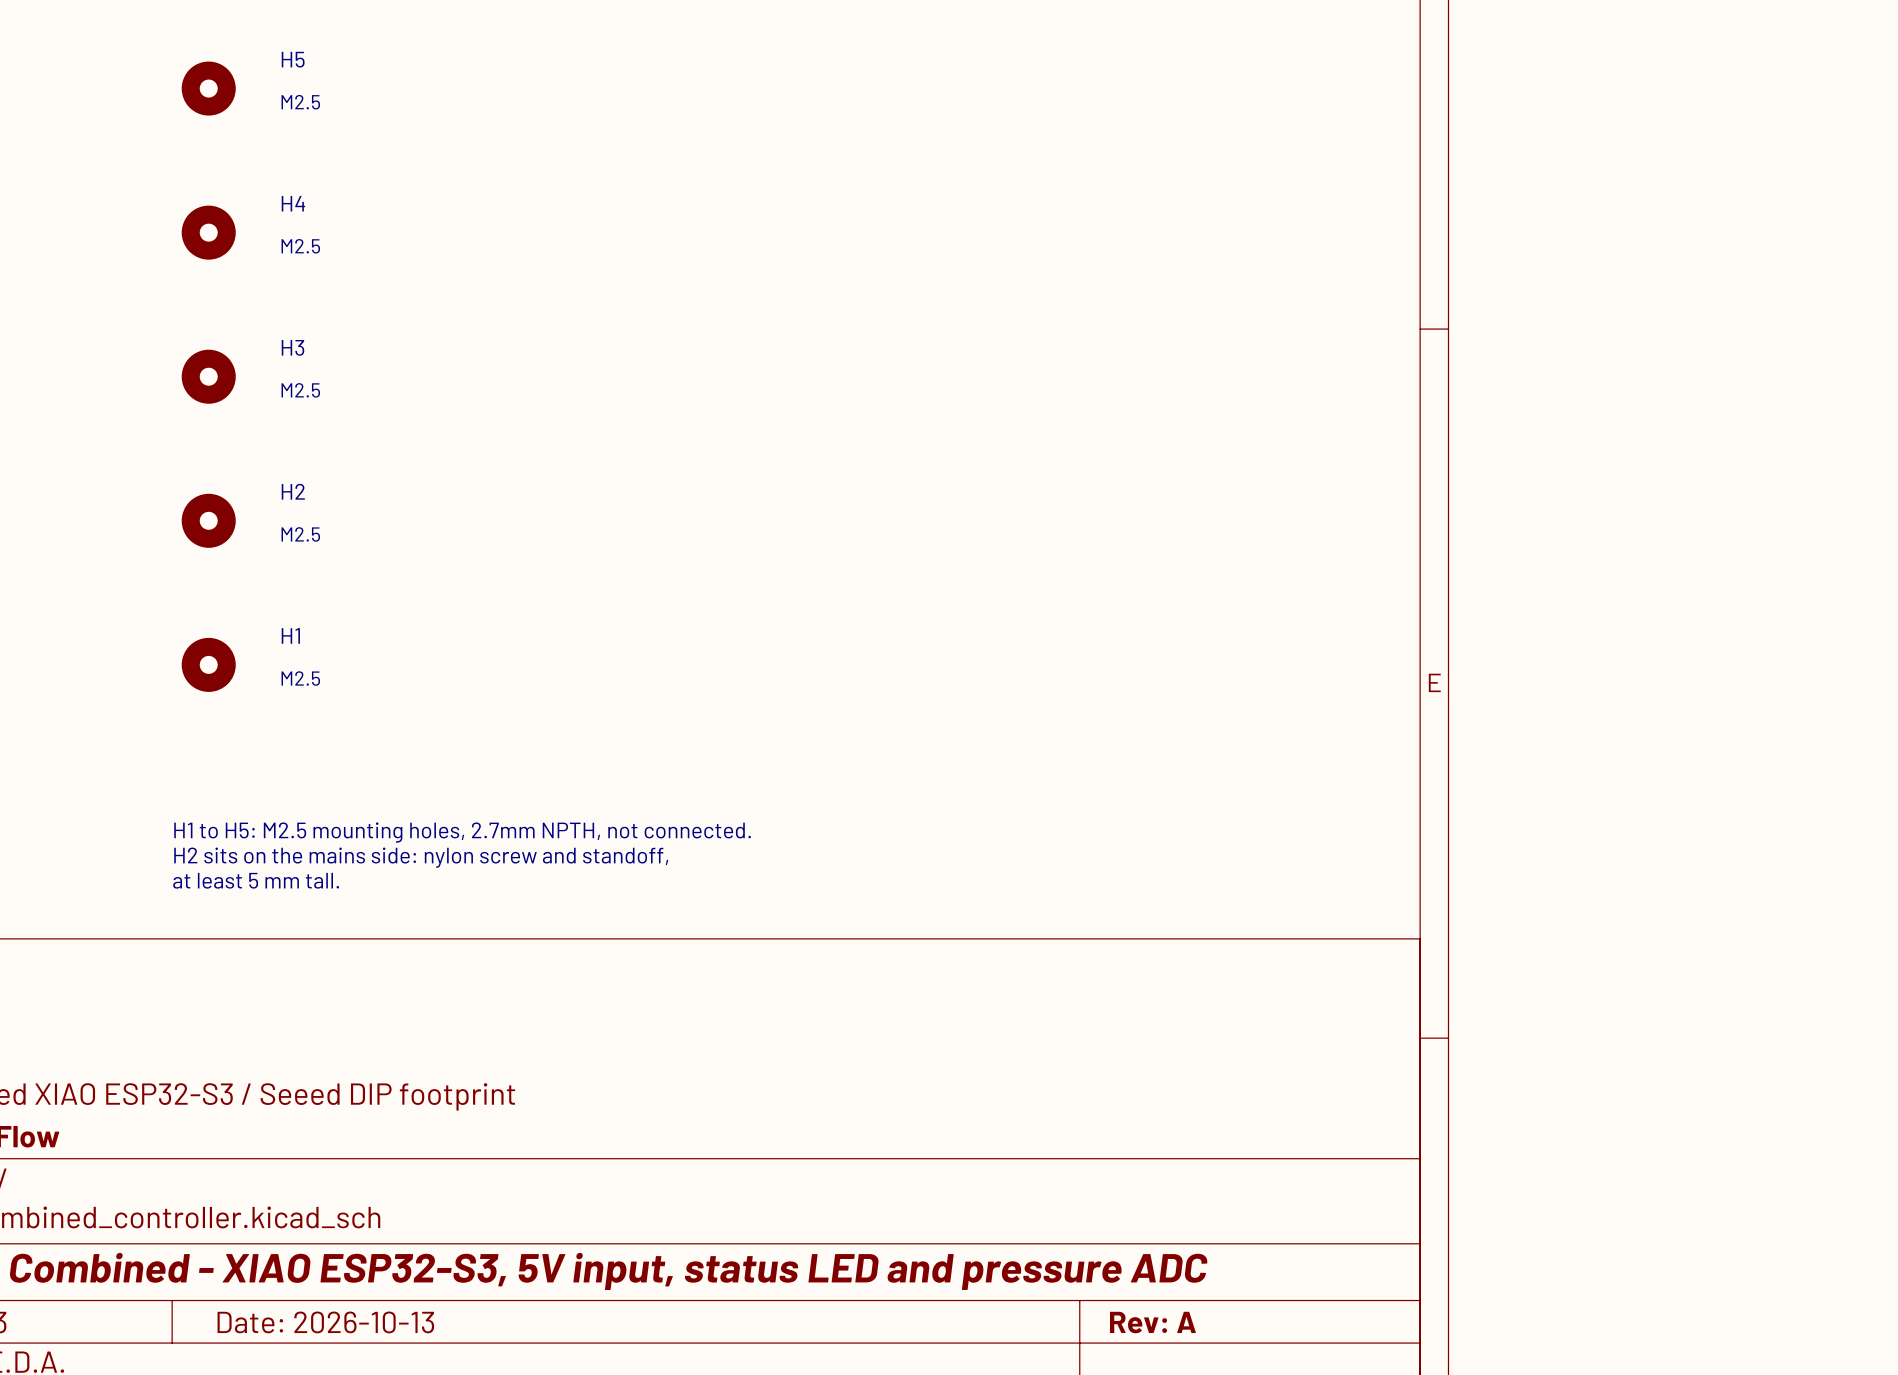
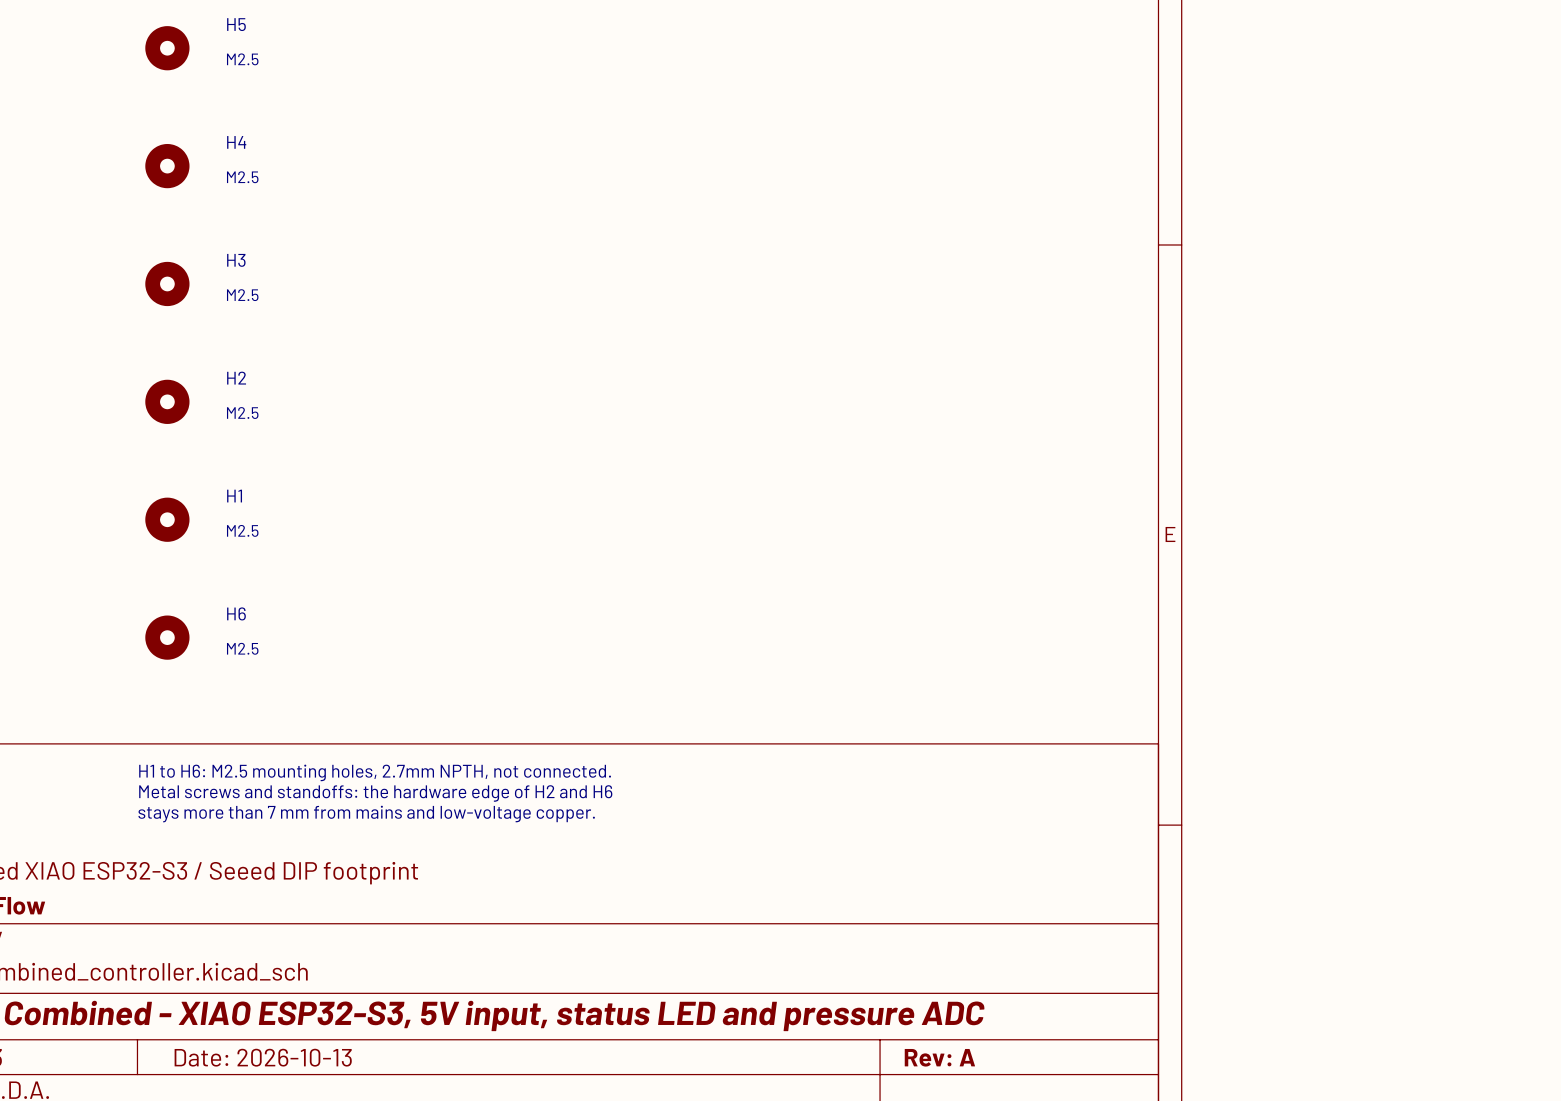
H6: none -> M2.5 (167, 637)
text: H1 to H5: M2.5 mounting holes, 2.7mm NPTH, not connected. (462, 832) -> none
text: H2 sits on the mains side: nylon screw and standoff, (421, 857) -> none
text: at least 5 mm tall. (256, 880) -> none
text: none -> H1 to H6: M2.5 mounting holes, 2.7mm NPTH, not connected. (375, 772)
text: none -> Metal screws and standoffs: the hardware edge of H2 and H6 (375, 793)
text: none -> stays more than 7 mm from mains and low-voltage copper. (366, 814)

